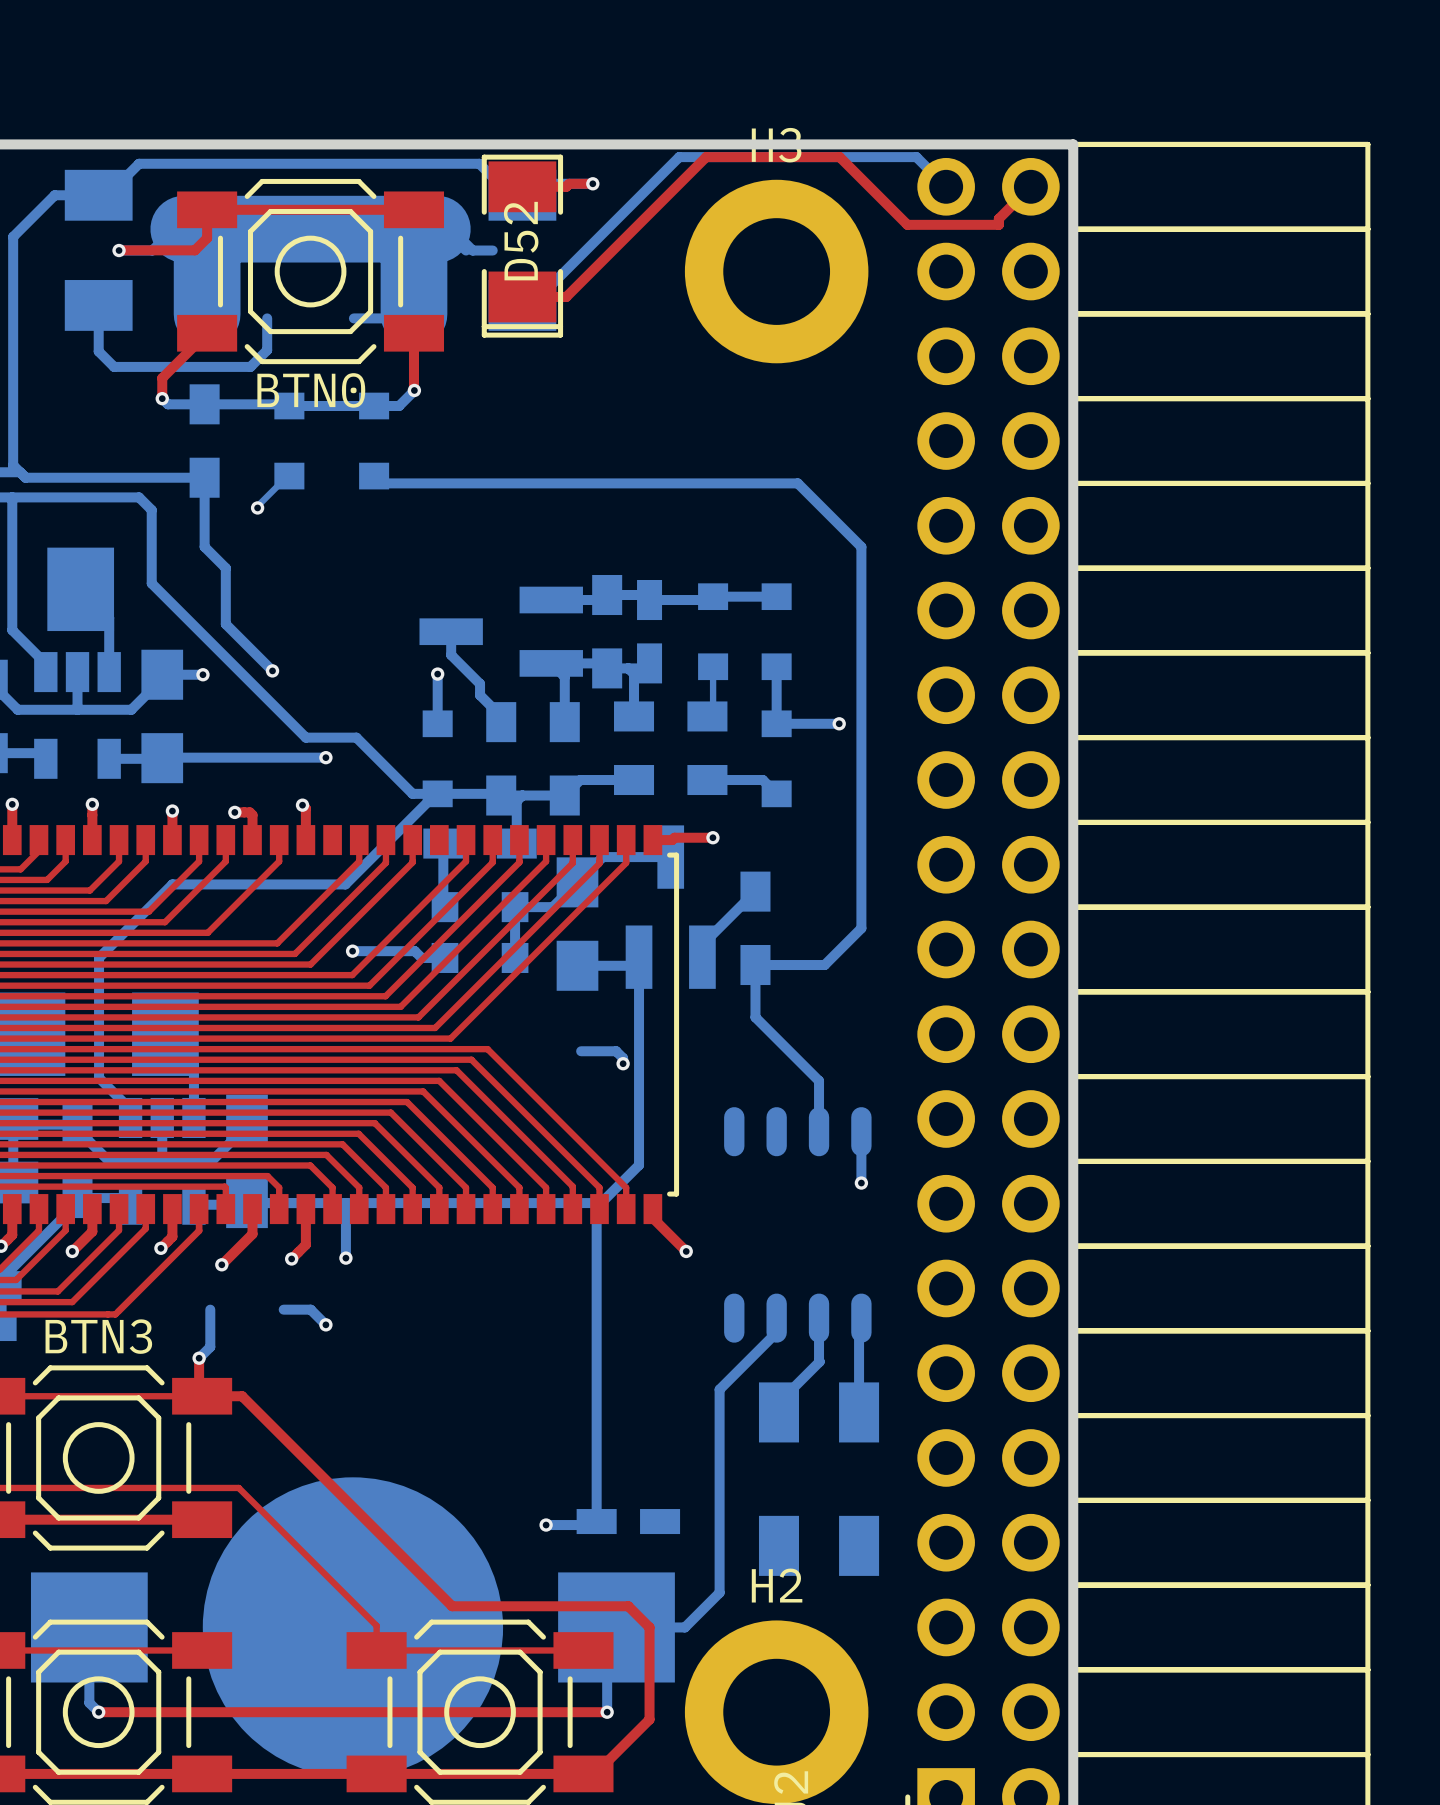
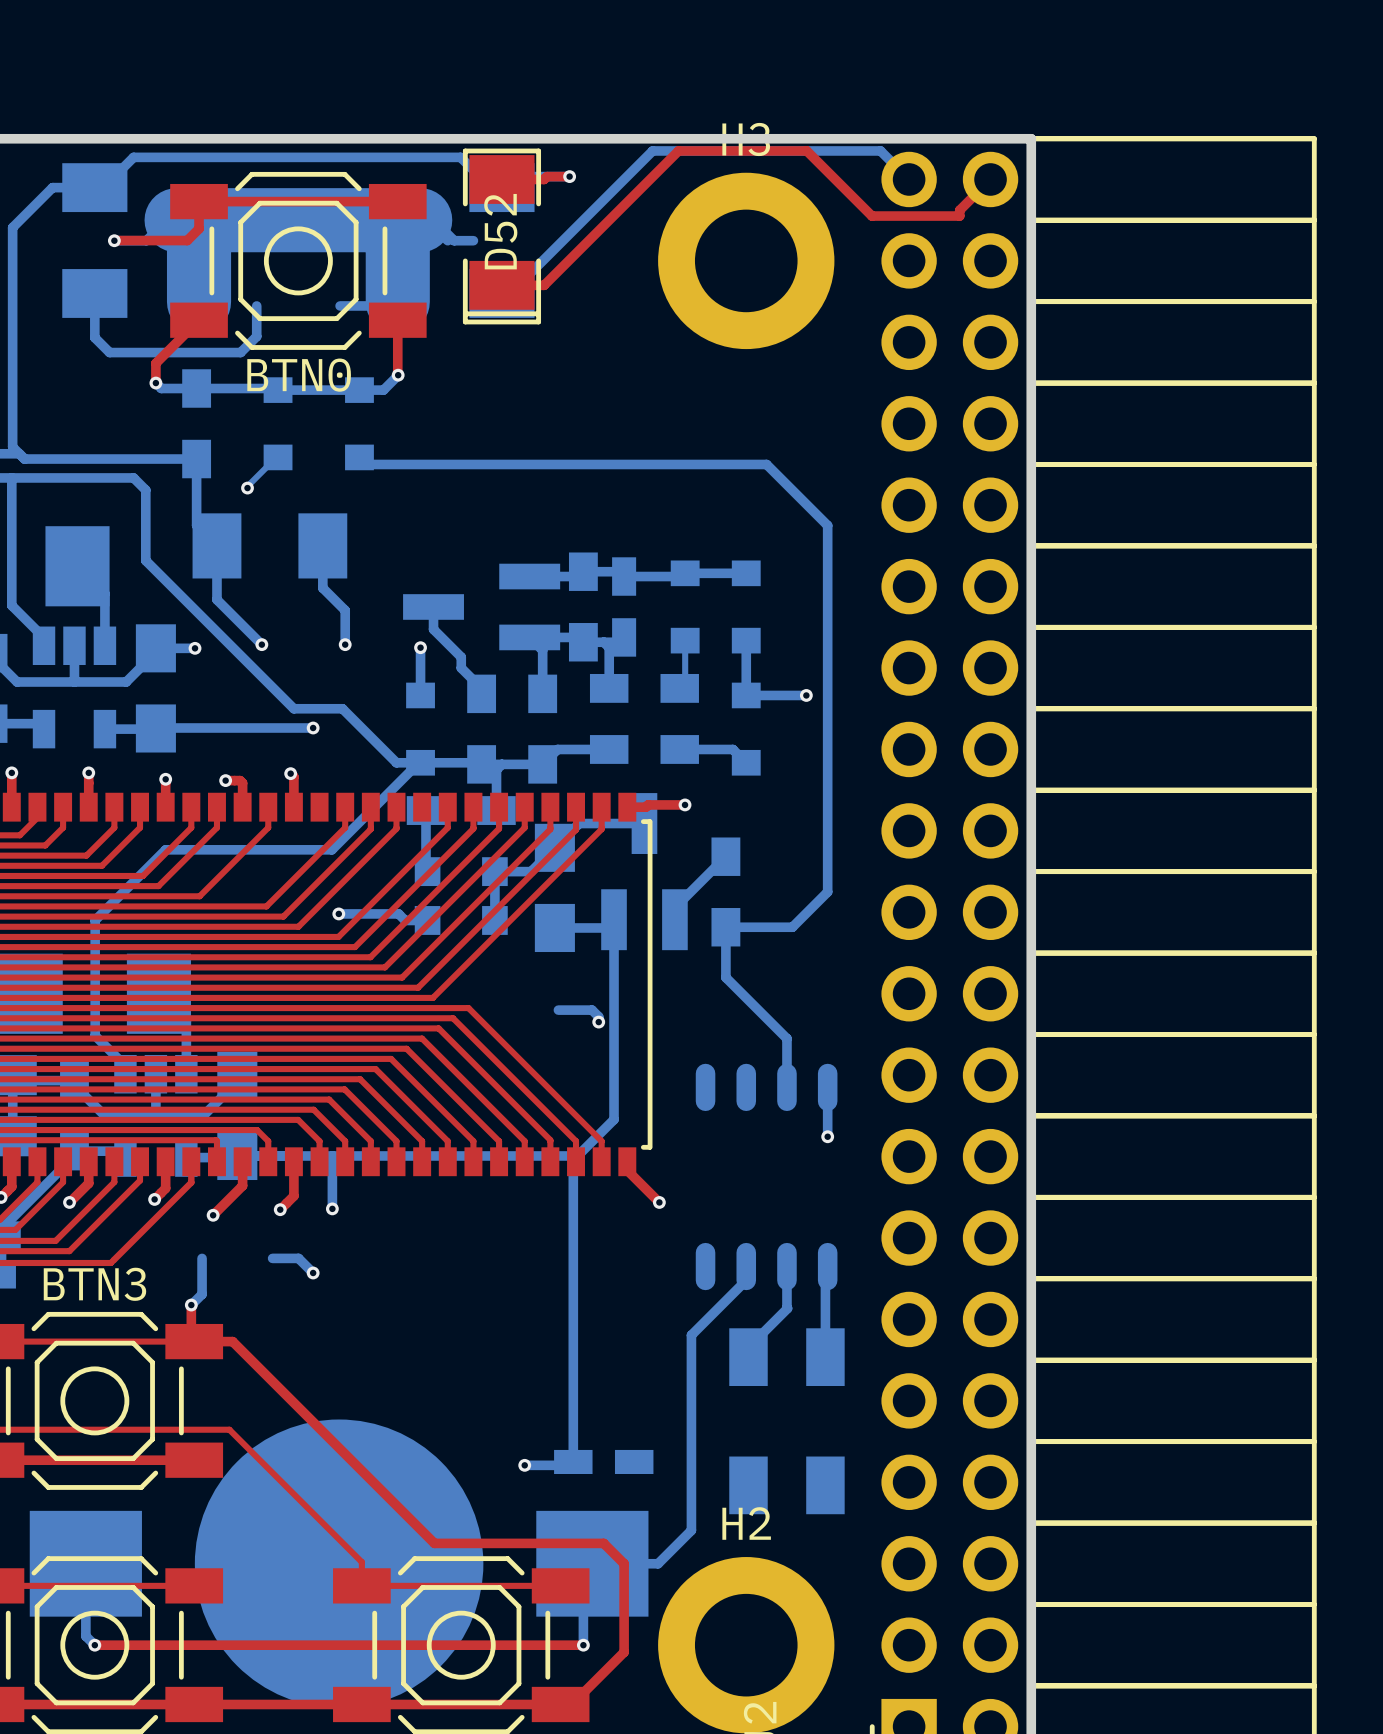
part: none -> (269, 545)
bottom track: none -> (322, 545) (322, 588) (345, 610) (345, 644)
via: none -> (345, 644)

